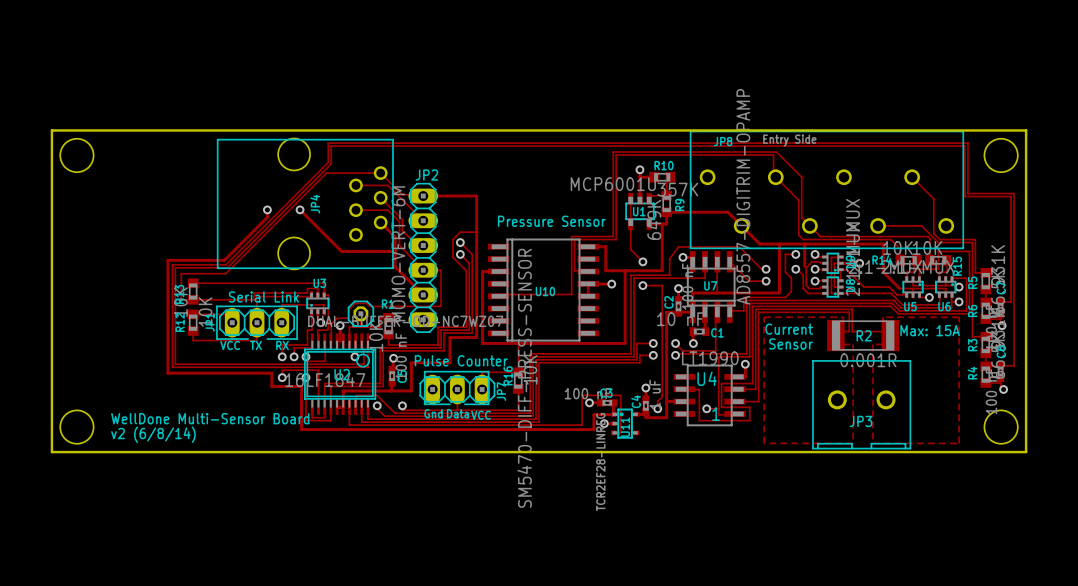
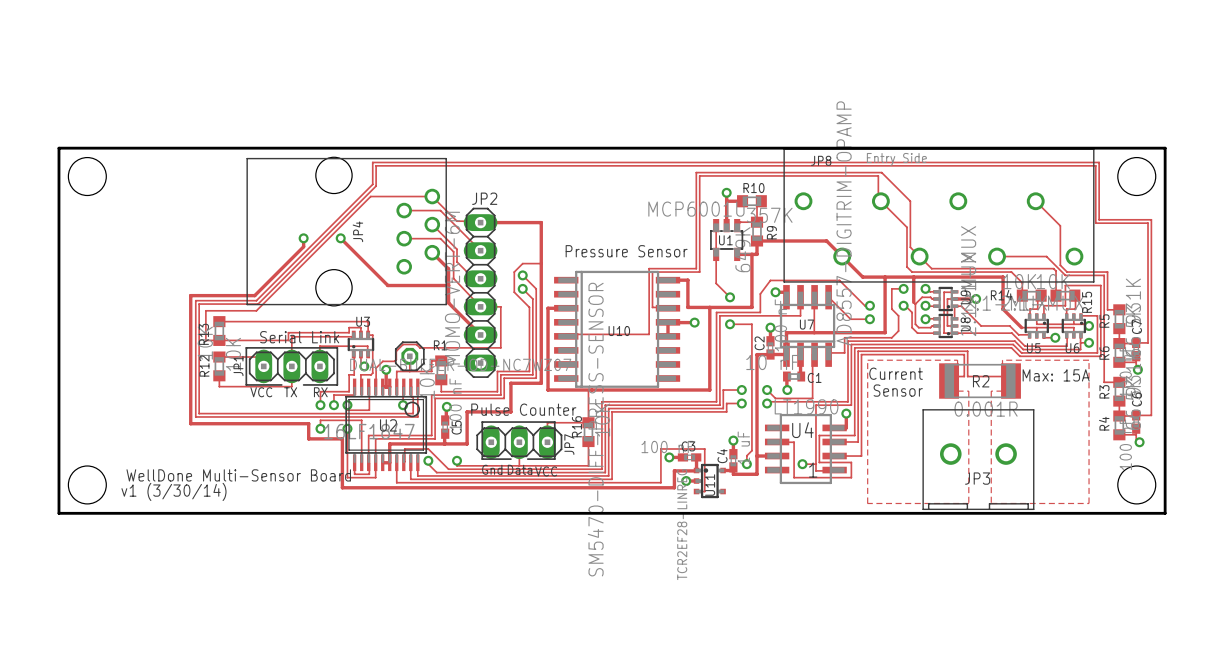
text: v2 (6/8/14) (153, 434) -> v1 (3/30/14) (173, 491)

